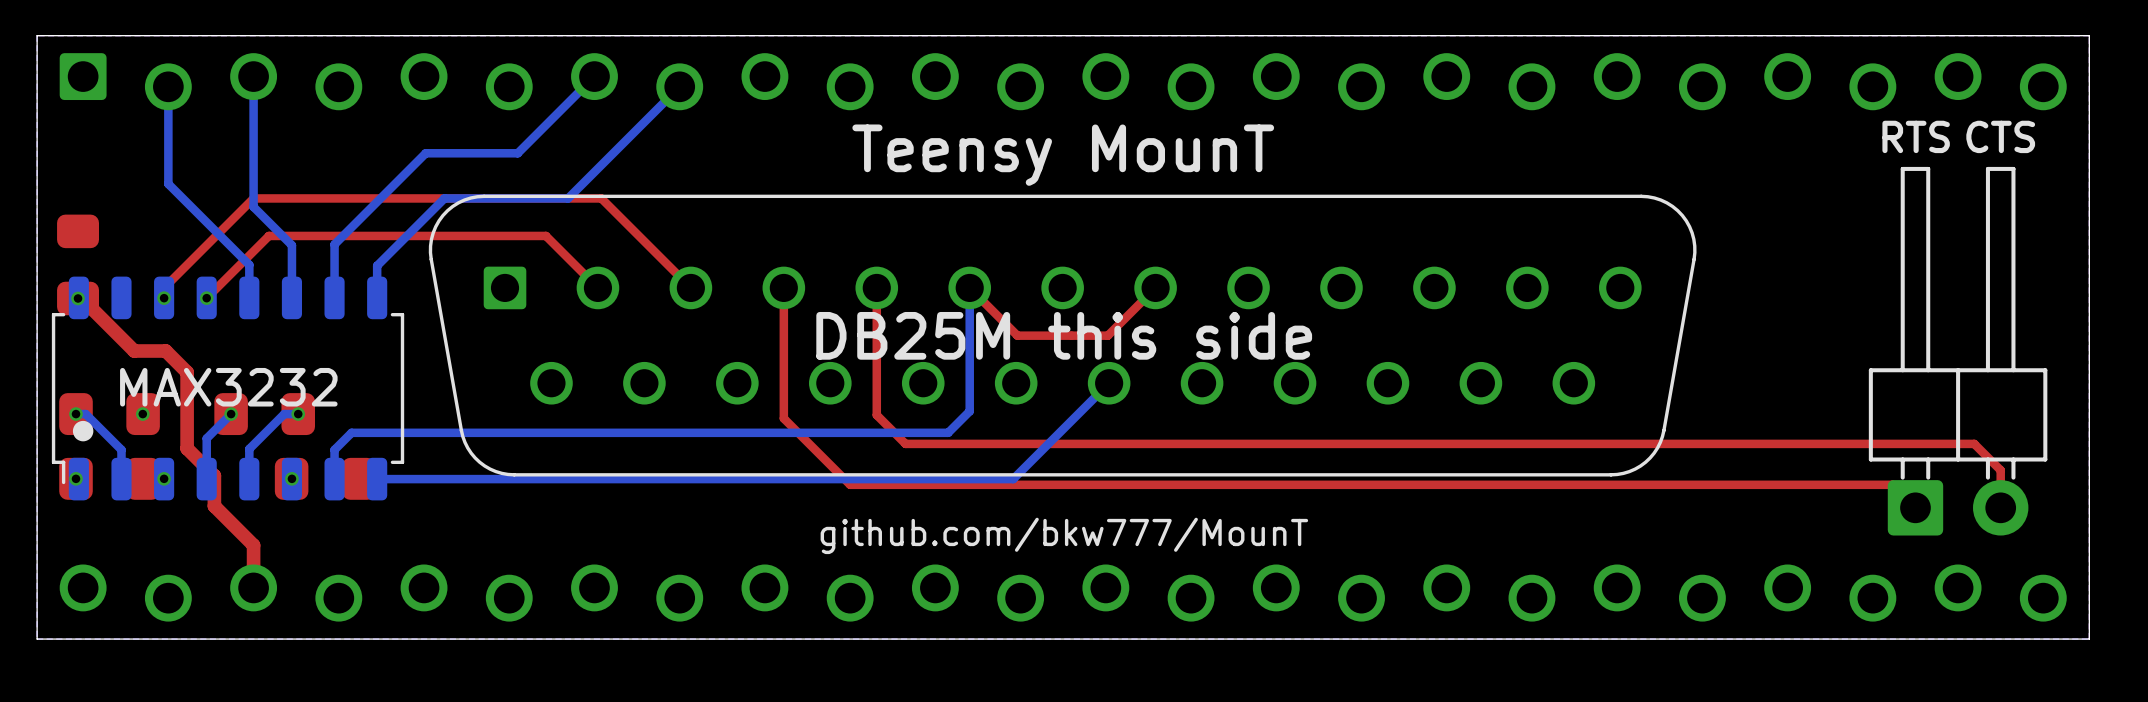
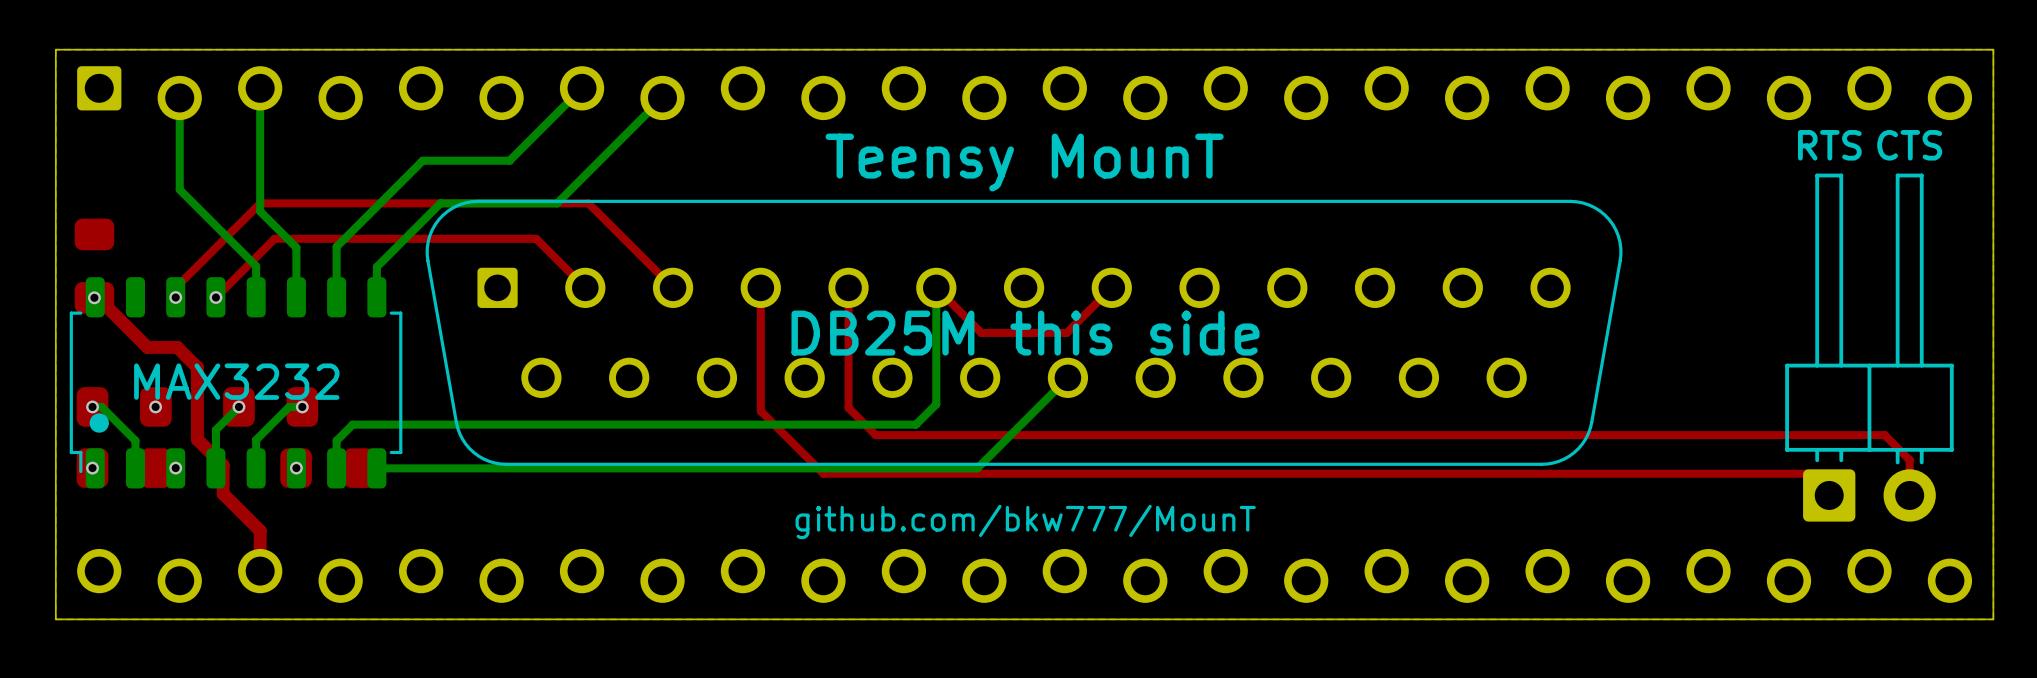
part footprint: [1868, 166, 2048, 536] -> [1785, 173, 1954, 522]

